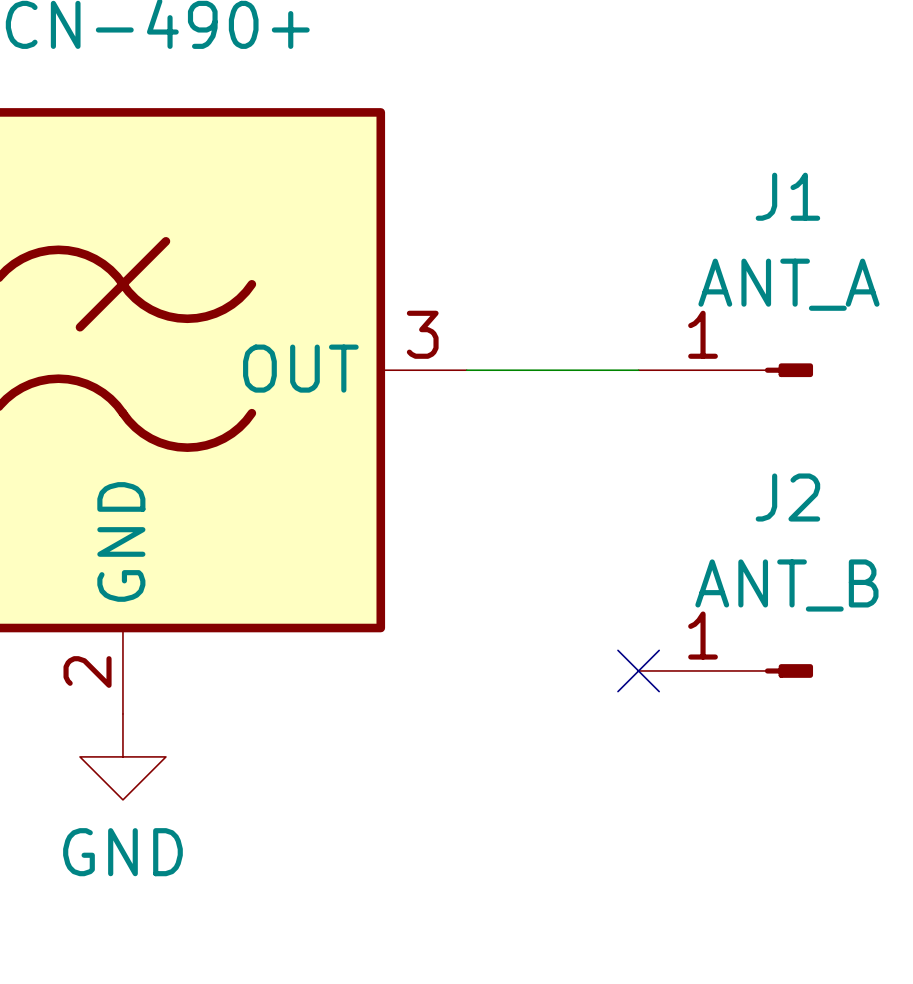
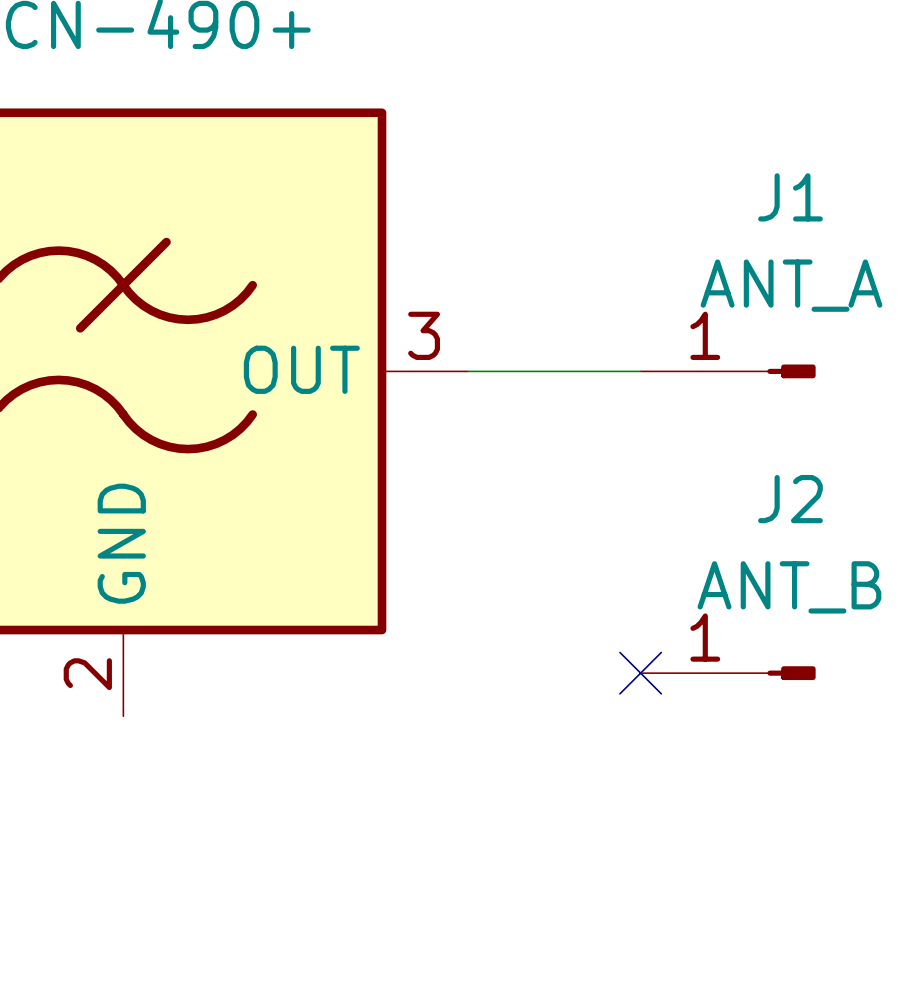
power symbol: GND (122, 756) -> none

